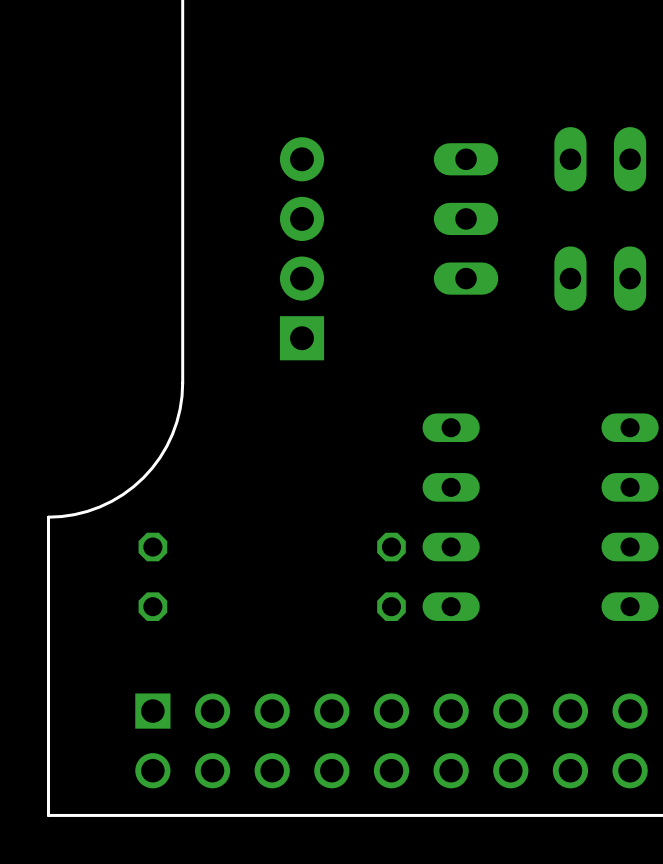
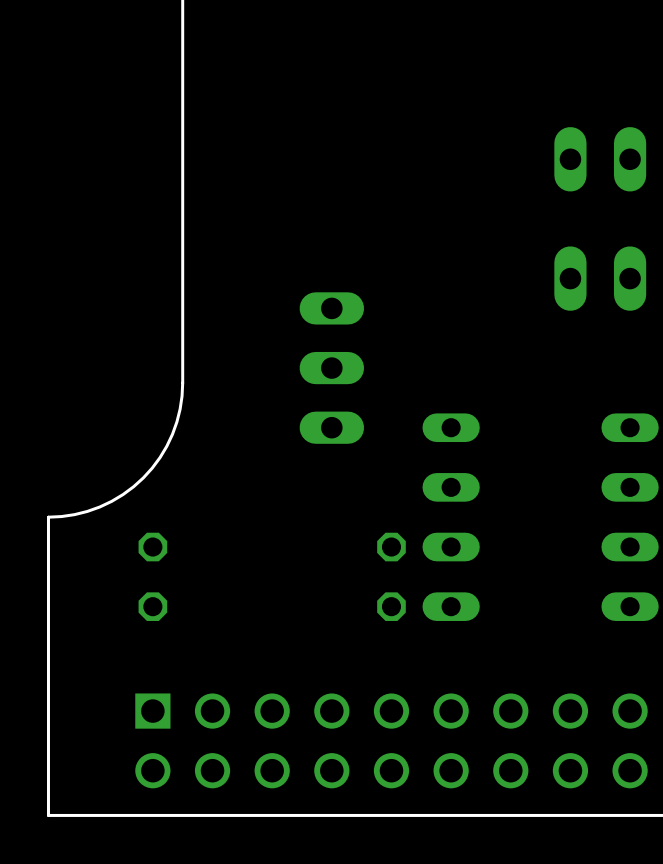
part position: (466, 218) -> (331, 368)
part: (302, 248) -> none

